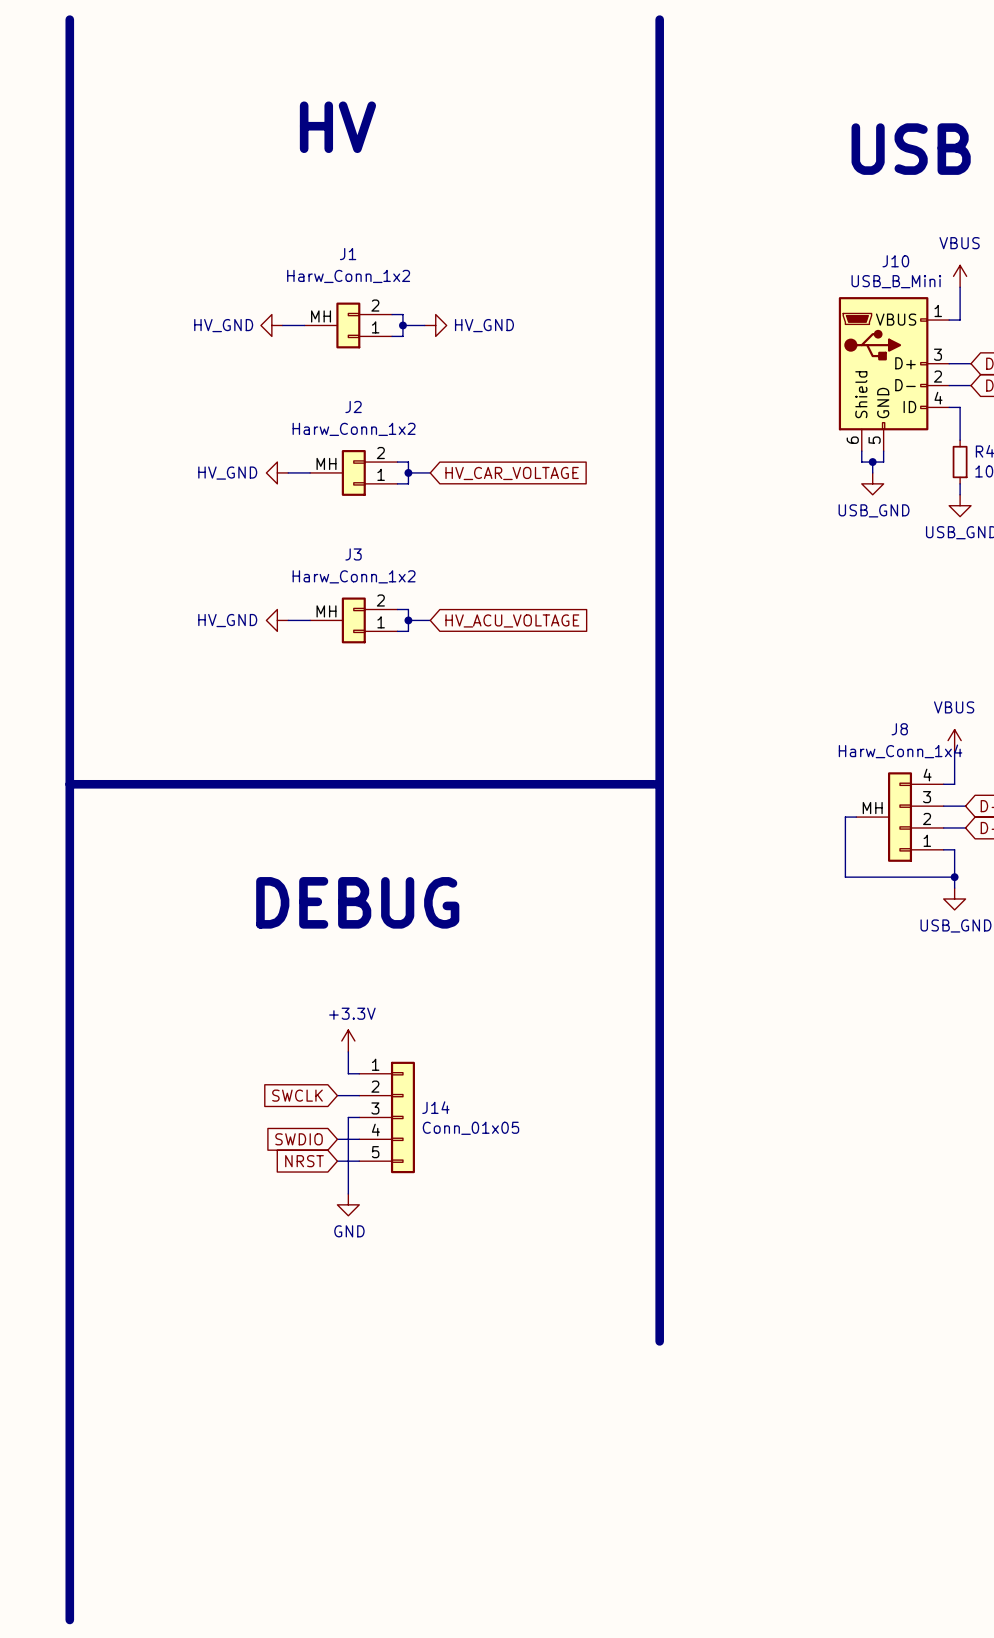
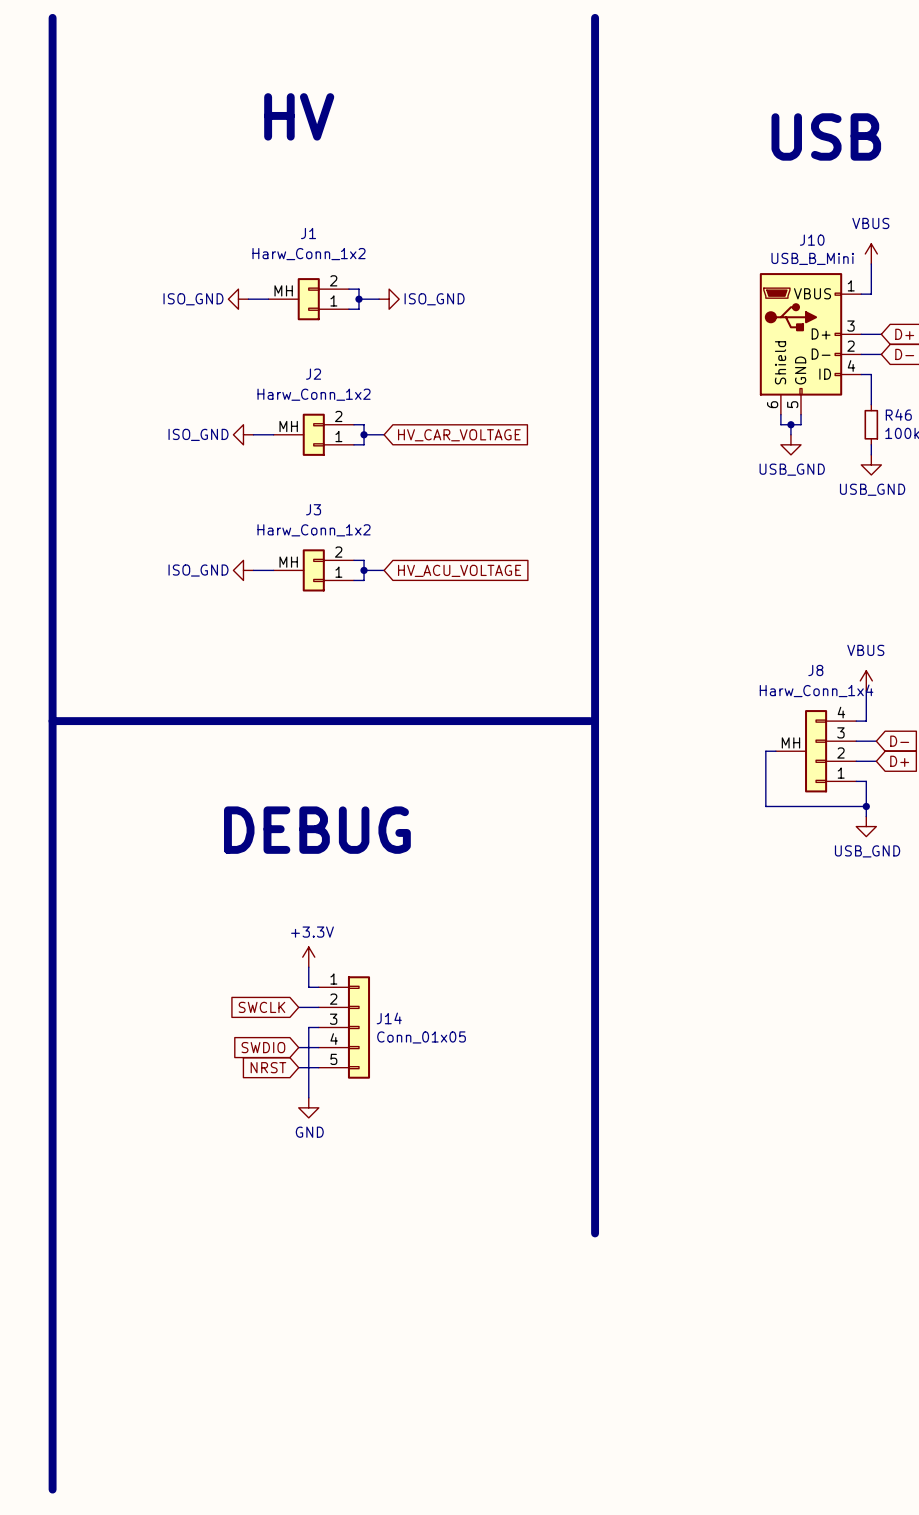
power symbol: HV_GND (271, 325) -> ISO_GND (238, 299)
power symbol: HV_GND (435, 325) -> ISO_GND (389, 299)
power symbol: HV_GND (277, 472) -> ISO_GND (243, 434)
power symbol: HV_GND (277, 620) -> ISO_GND (243, 570)

